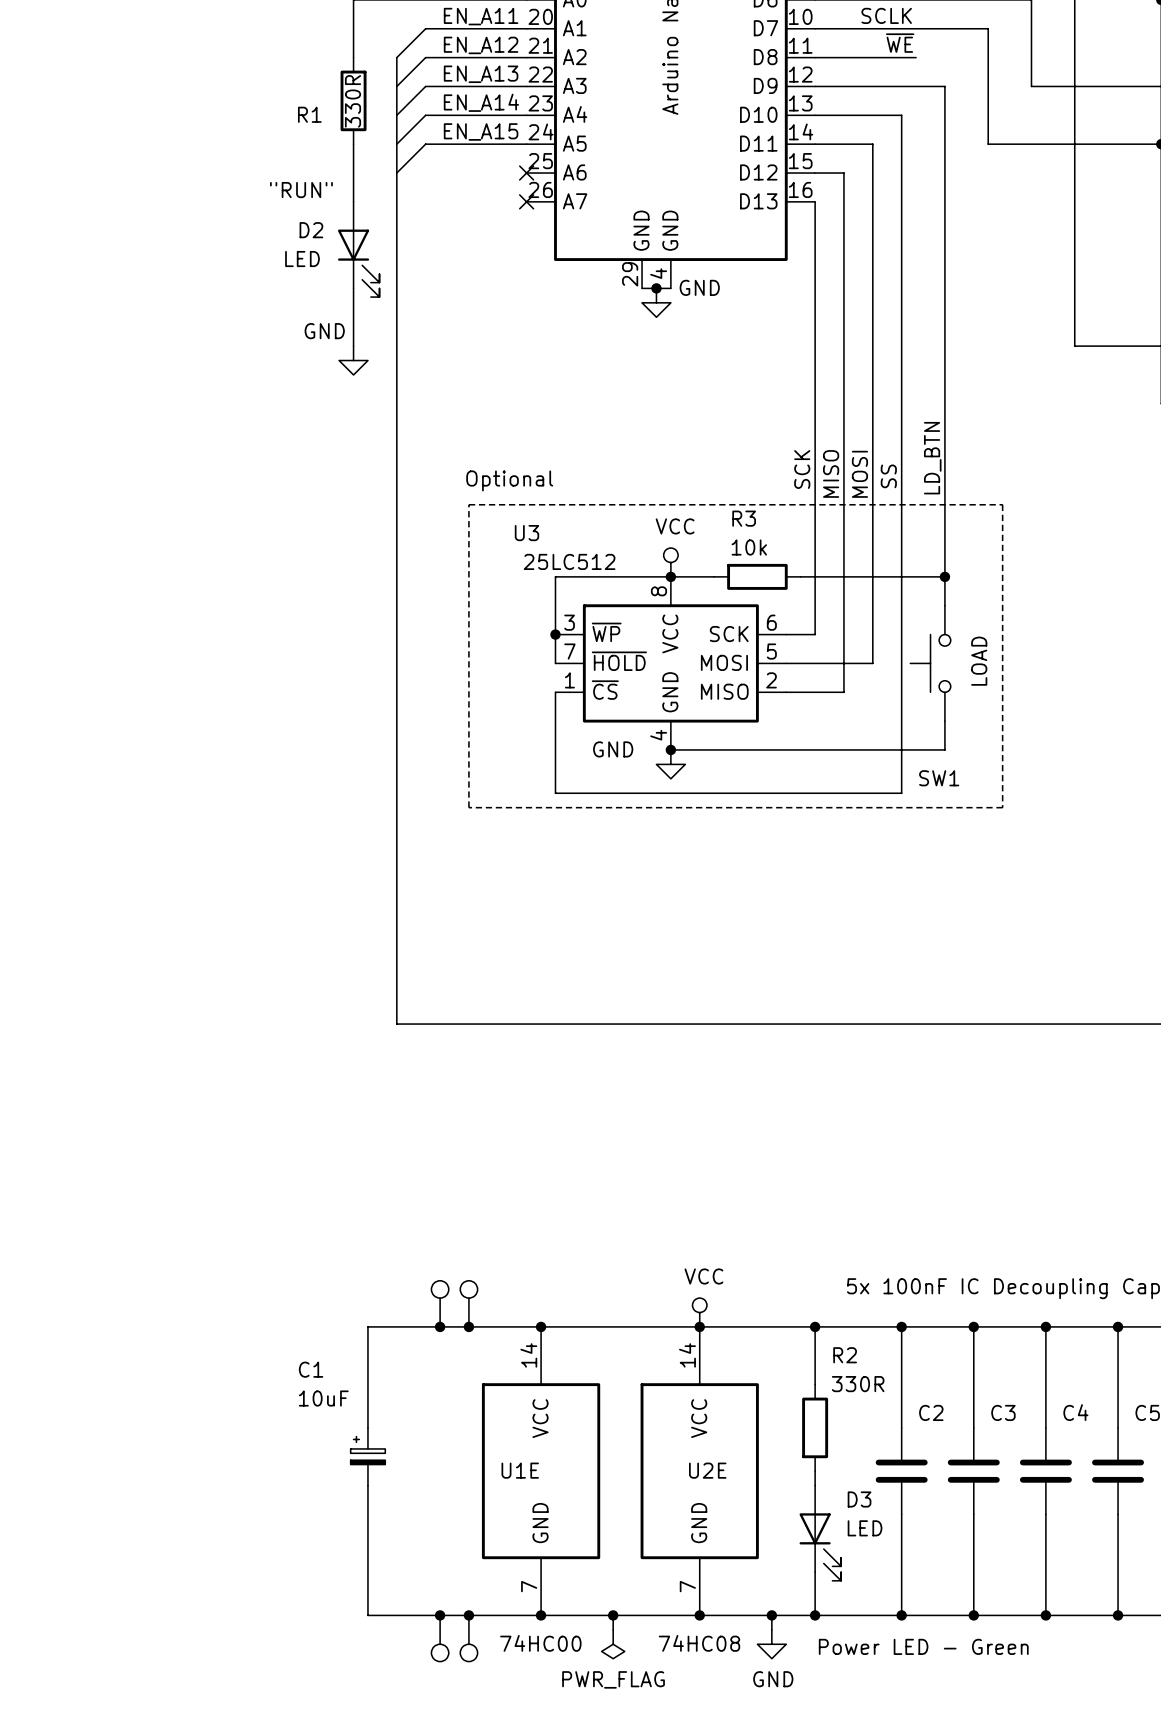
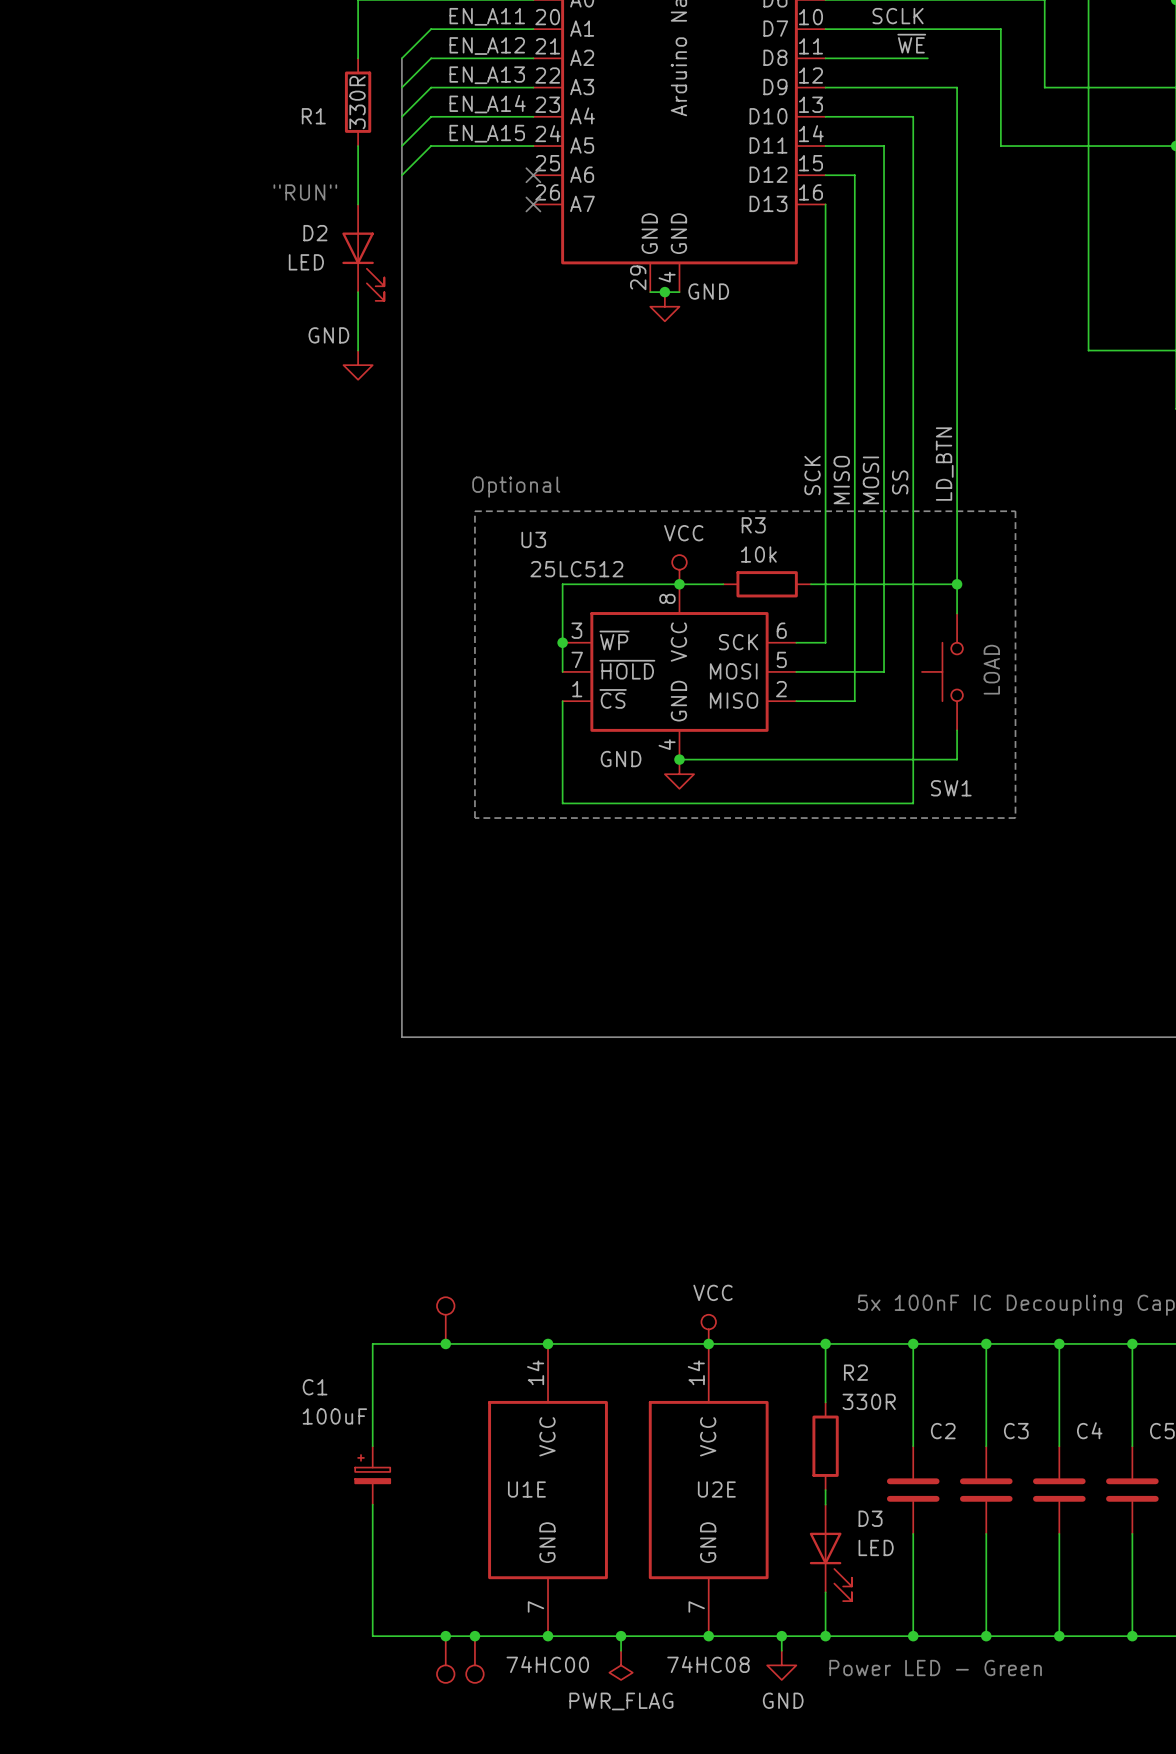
part: (468, 1303) -> none
junction: (468, 1326) -> none
C1 value: 10uF (323, 1398) -> 100uF (334, 1416)

